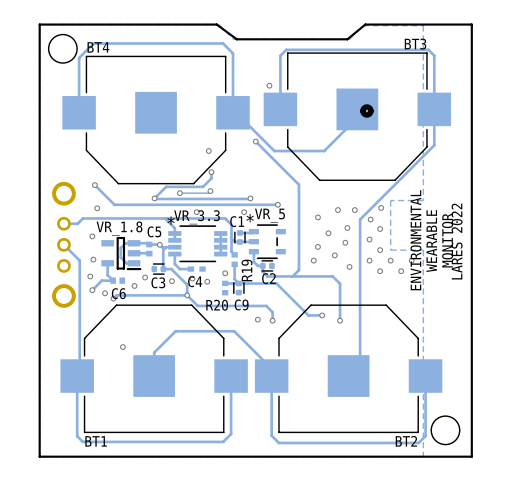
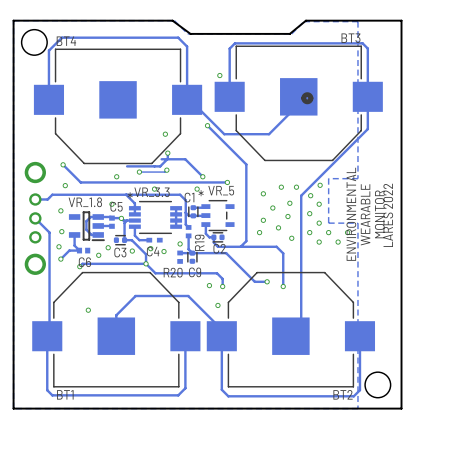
track: (166, 186) (155, 198) (250, 198) -> (161, 159) (185, 159) (202, 176)
via: none -> (111, 204)
via: (105, 293) -> none
via: none -> (217, 305)

